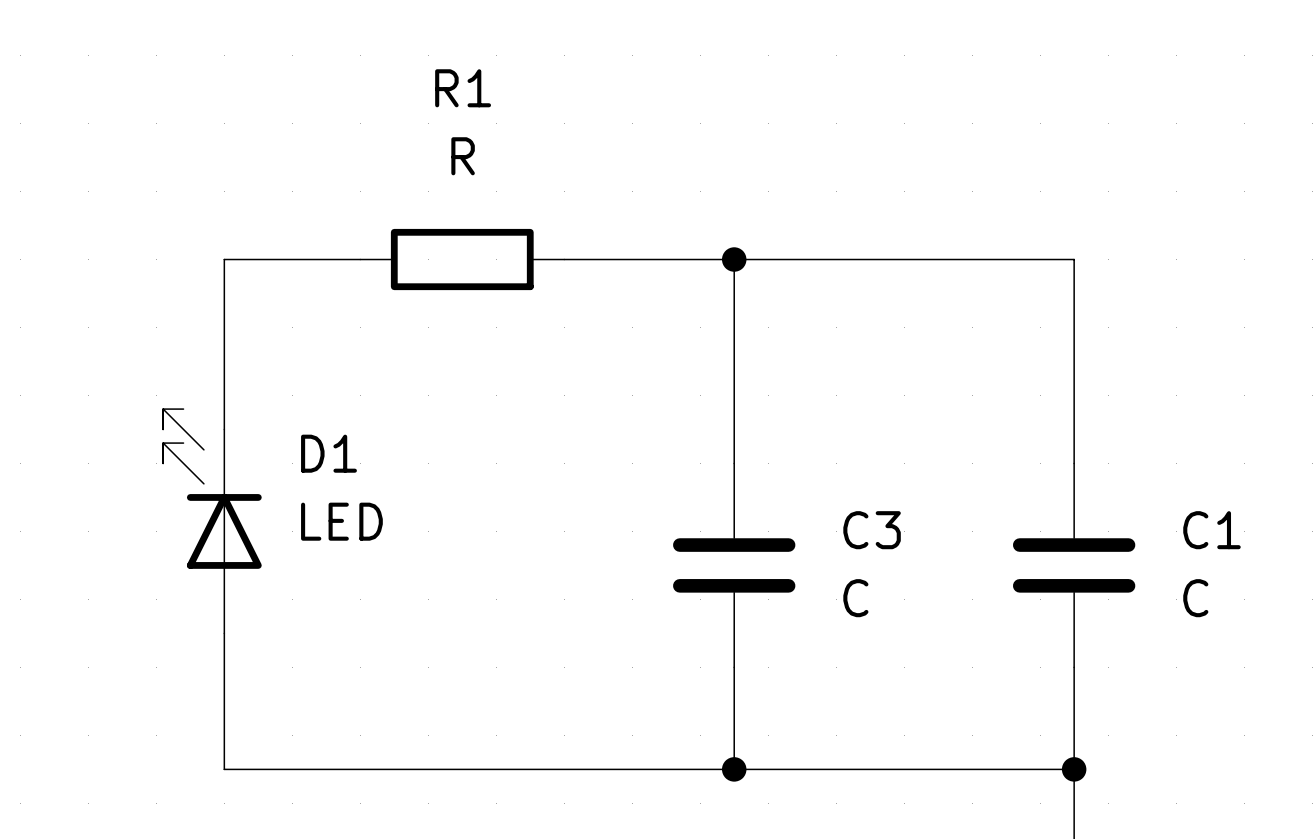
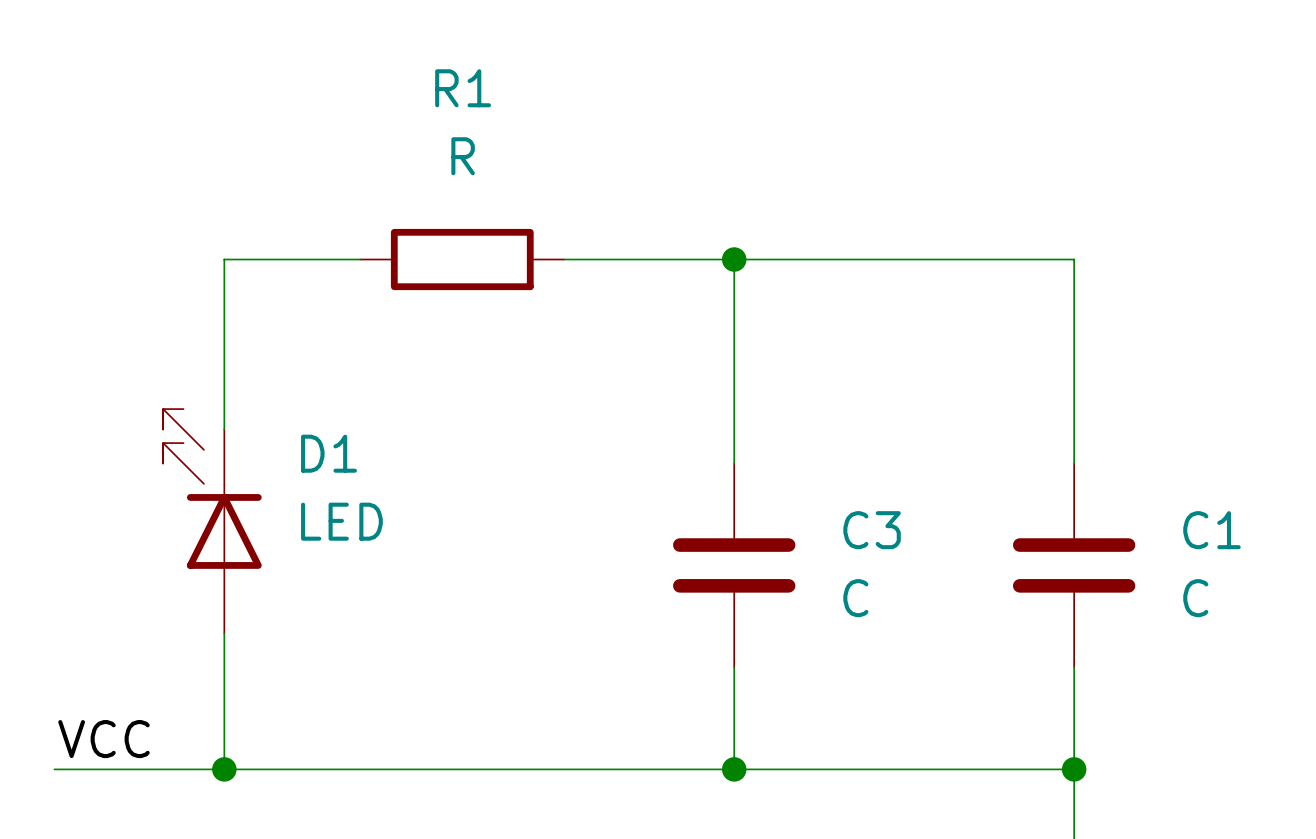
label: none -> VCC (103, 739)
wire: none -> (54, 769) (224, 769)
junction: none -> (224, 769)

